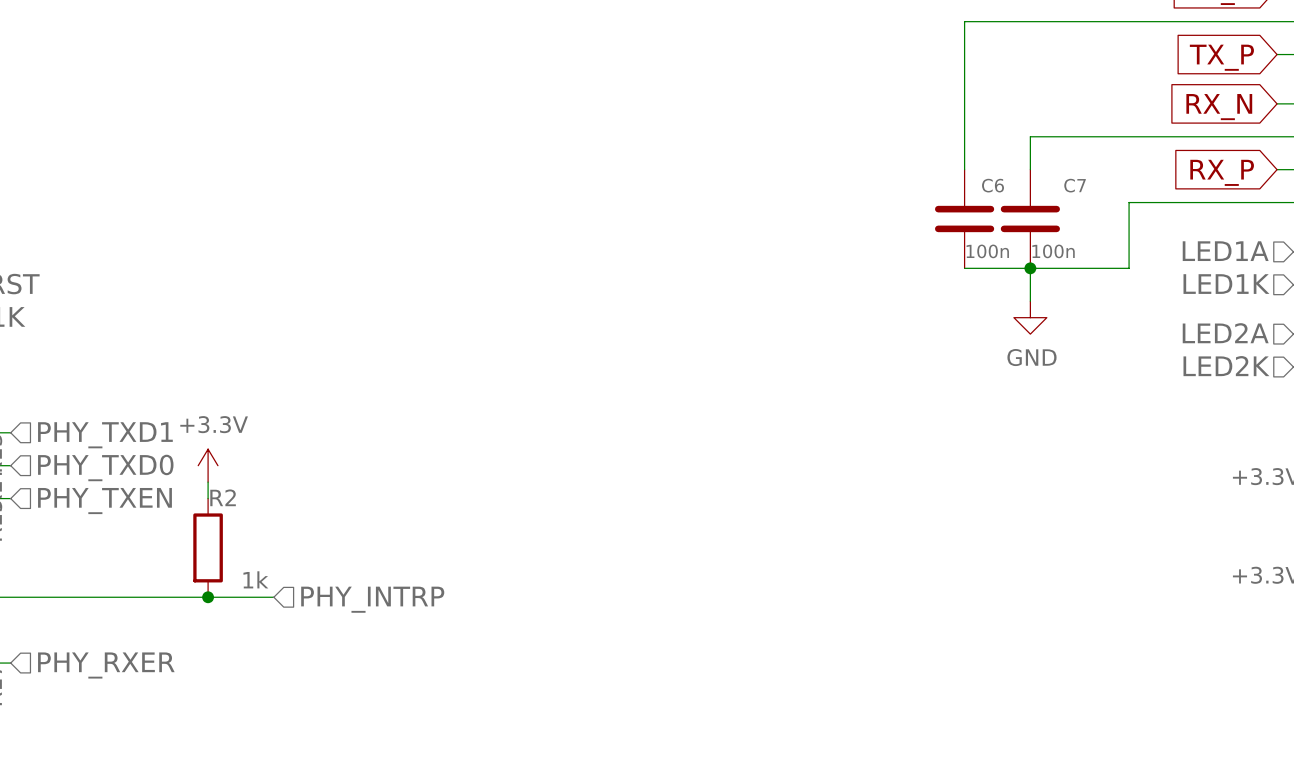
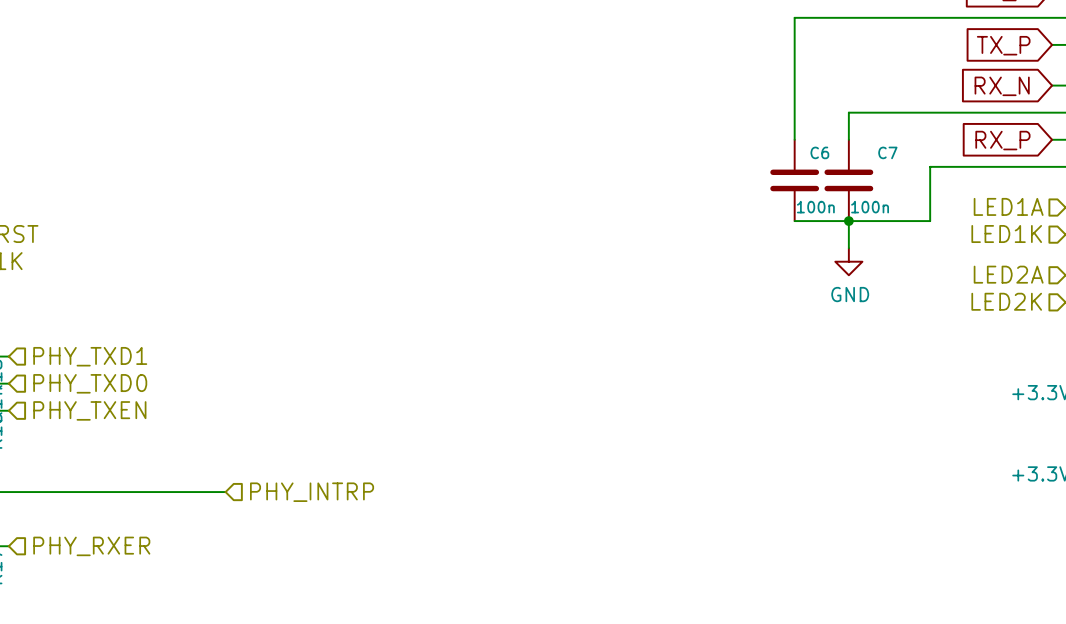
power symbol: +3.3V (208, 465) -> none
wire: (208, 482) (208, 498) -> none
R2: 1k (208, 547) -> none
junction: (208, 597) -> none

